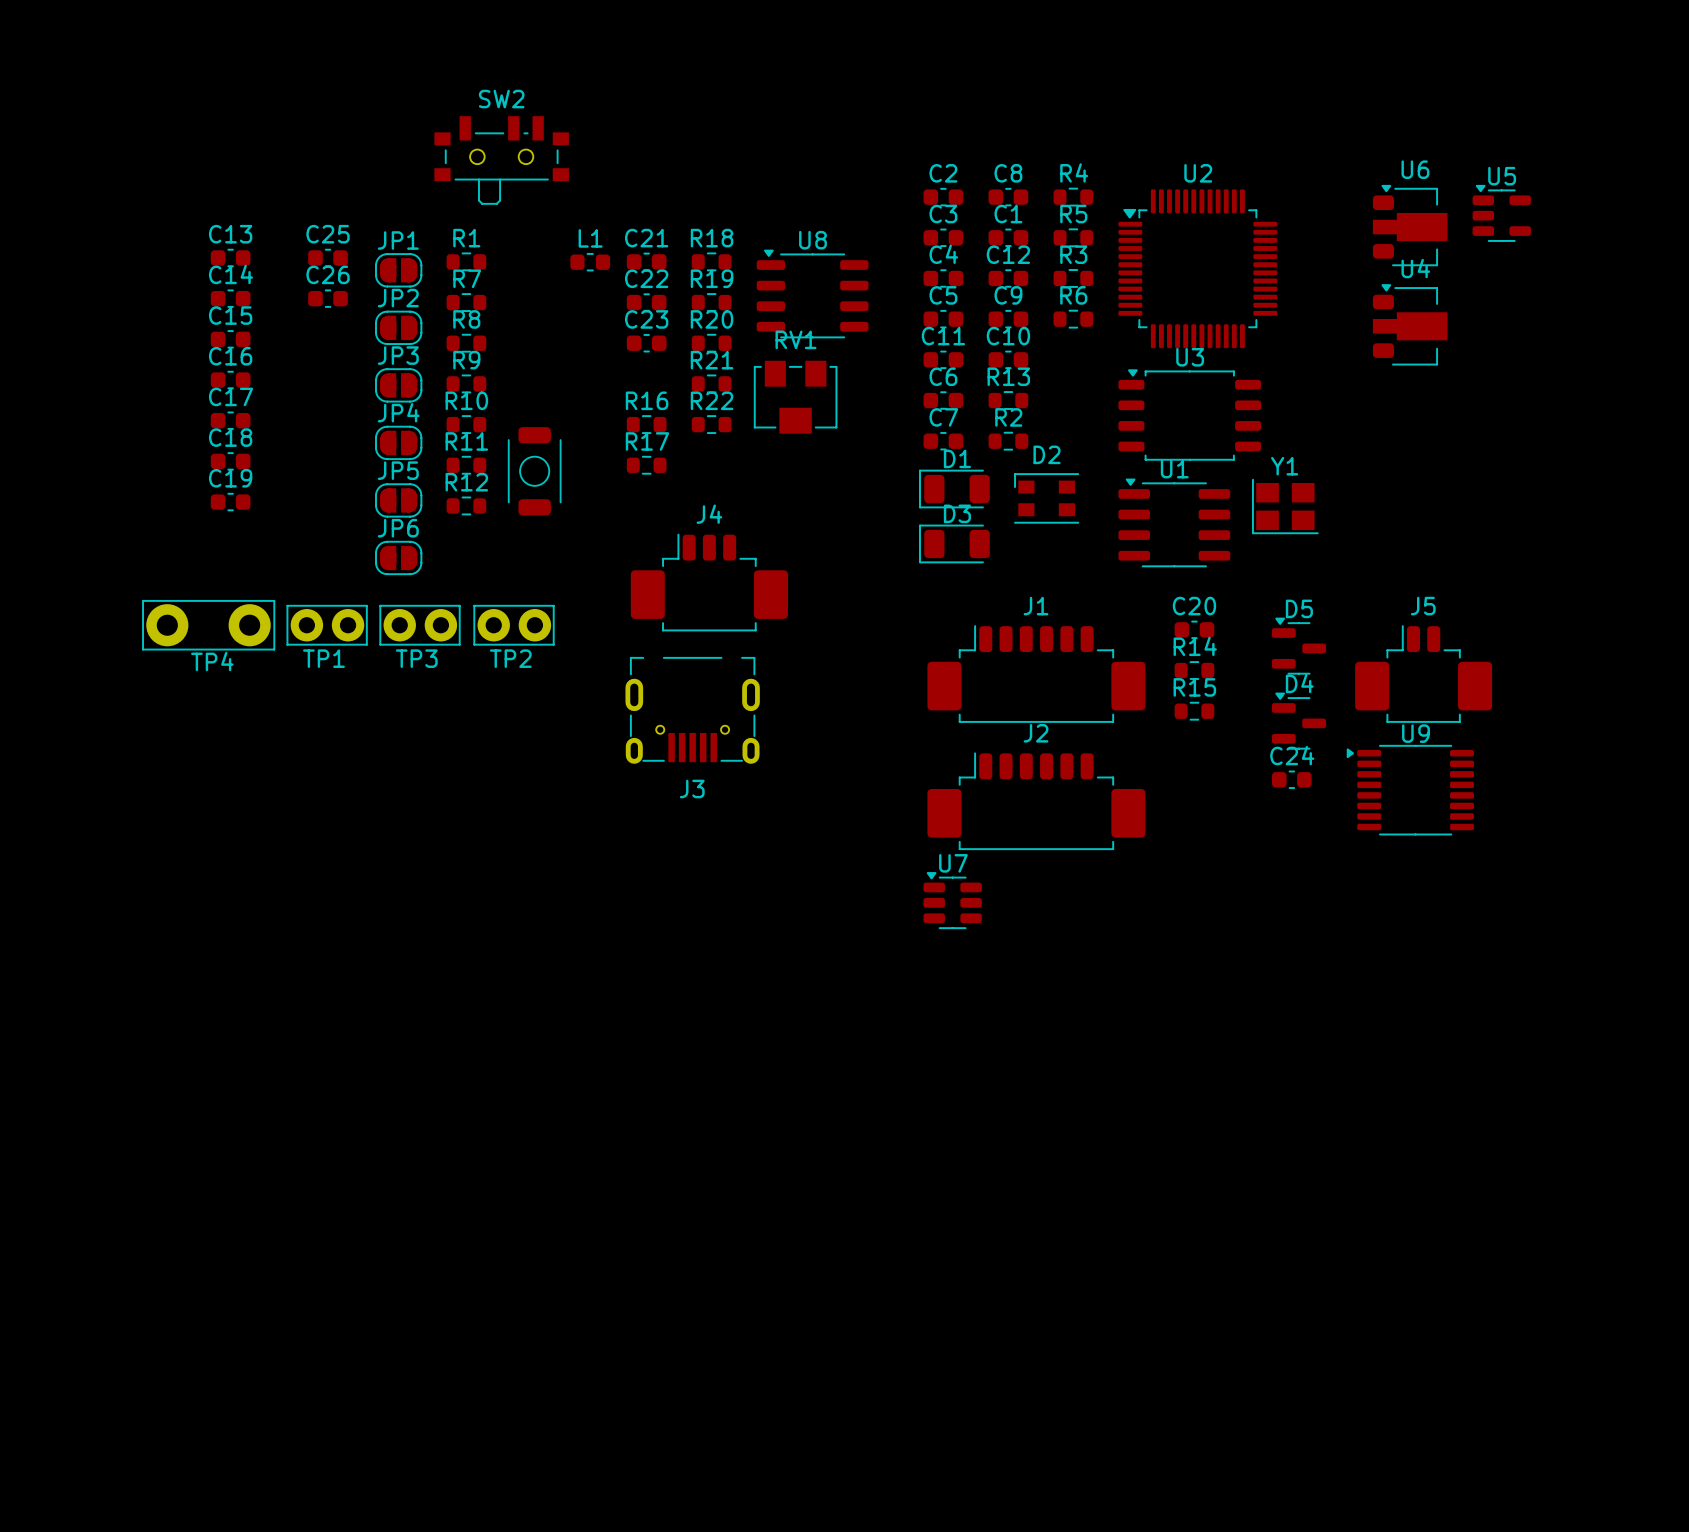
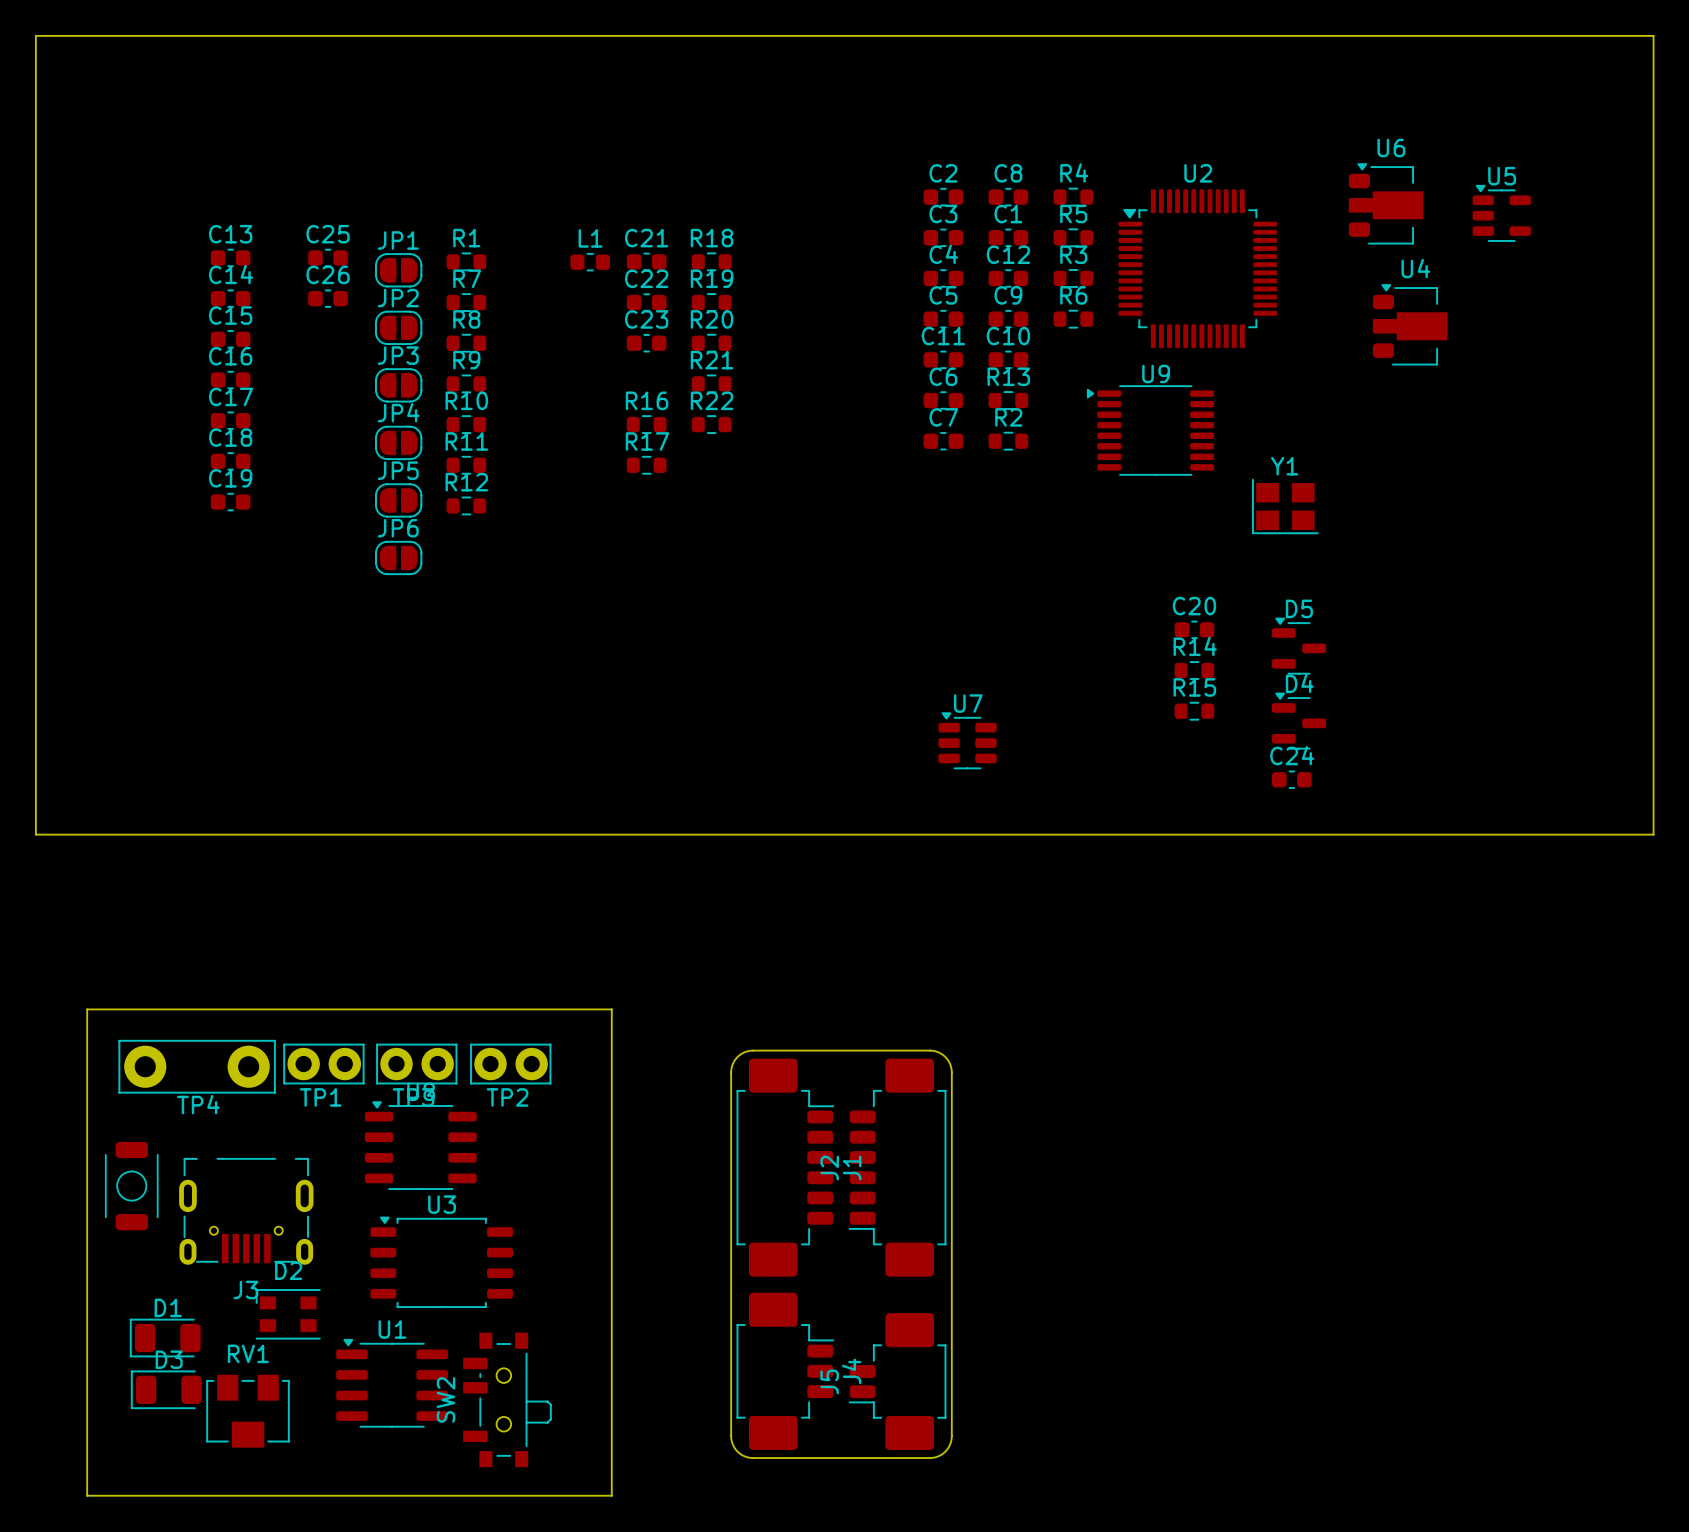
board edge: none -> (35, 35) (1653, 35) (1653, 834) (35, 834) (35, 35)
SW2 rotation: 0° (501, 160) -> 90° counterclockwise (507, 1399)
SW2 position: (501, 160) -> (507, 1399)
U6 position: (1410, 225) -> (1386, 203)
U8 position: (812, 294) -> (420, 1145)
RV1 position: (795, 397) -> (248, 1411)
U3 position: (1189, 415) -> (441, 1262)
part: (534, 471) -> none
D1 position: (954, 489) -> (165, 1338)
D2 position: (1046, 498) -> (288, 1314)
U1 position: (1174, 522) -> (392, 1383)
D3 position: (954, 543) -> (166, 1389)
J4 rotation: 0° (709, 582) -> 90° clockwise (785, 1371)
J4 position: (709, 582) -> (785, 1371)
TP4 footprint: [142, 599, 276, 651] -> [118, 1039, 276, 1094]
TP1 position: (327, 625) -> (323, 1064)
TP3 position: (420, 625) -> (416, 1064)
TP2 position: (514, 625) -> (510, 1064)
J1 rotation: 0° (1036, 674) -> 90° clockwise (785, 1167)
J1 position: (1036, 674) -> (785, 1167)
J5 rotation: 0° (1423, 674) -> 90° counterclockwise (897, 1381)
J5 position: (1423, 674) -> (897, 1381)
J3 position: (692, 710) -> (246, 1211)
U9 position: (1410, 790) -> (1150, 430)
J2 rotation: 0° (1036, 801) -> 90° counterclockwise (897, 1167)
J2 position: (1036, 801) -> (897, 1167)
U7 position: (952, 900) -> (967, 740)
board edge: none -> (87, 1009) (611, 1009) (611, 1495) (87, 1495) (87, 1009)
board edge: none -> (753, 1050) (932, 1050) (943, 1055) (950, 1064) (951, 1072) (951, 1436) (947, 1449) (938, 1456) (929, 1458) (753, 1458) (742, 1455) (732, 1444) (731, 1436) (731, 1072) (732, 1064) (737, 1057) (744, 1052) (753, 1050)
part: none -> (131, 1186)

